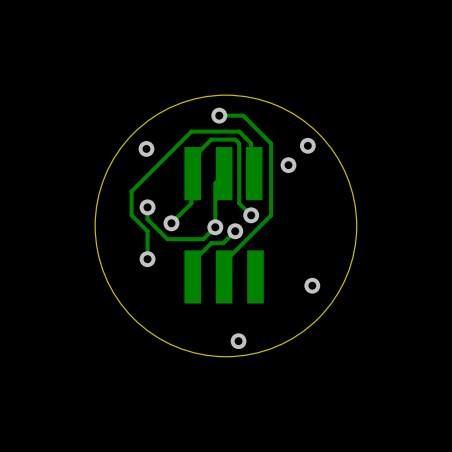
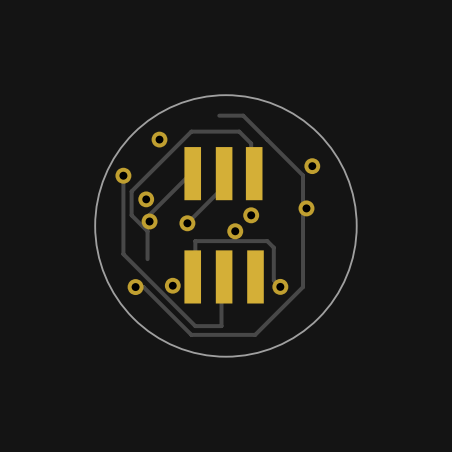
via: (219, 115) -> none
track: (271, 143) (271, 215) (227, 259) (227, 275) (224, 276) -> (271, 143) (303, 175) (303, 207) (306, 208) (303, 211) (303, 287) (255, 334) (191, 334) (143, 287) (135, 287)
via: (307, 145) -> none
via position: (146, 148) -> (159, 139)
via: (288, 165) -> none
via: none -> (312, 166)
track: none -> (192, 173) (149, 214) (149, 221)
track: none -> (123, 175) (123, 254) (195, 326) (221, 326) (221, 280) (224, 276)
via: none -> (123, 175)
track: (223, 175) (215, 183) (215, 227) (203, 239) (167, 239) (147, 219) (147, 207) -> (223, 175) (223, 187) (187, 223)
via: none -> (146, 199)
via: (147, 207) -> none
via: none -> (306, 208)
track: (251, 215) (239, 203) (239, 143) (235, 139) (211, 139) (195, 155) (195, 171) (191, 175) (191, 203) (171, 223) -> none
via: none -> (149, 221)
via position: (171, 223) -> (187, 223)
via: (215, 227) -> none
track: (235, 231) (223, 243) (211, 243) (195, 259) -> (280, 286) (273, 280) (273, 247) (267, 241) (195, 241) (195, 259)
via: (147, 259) -> none
via: none -> (172, 285)
via position: (312, 285) -> (280, 286)
via: none -> (135, 287)
via: (238, 341) -> none

